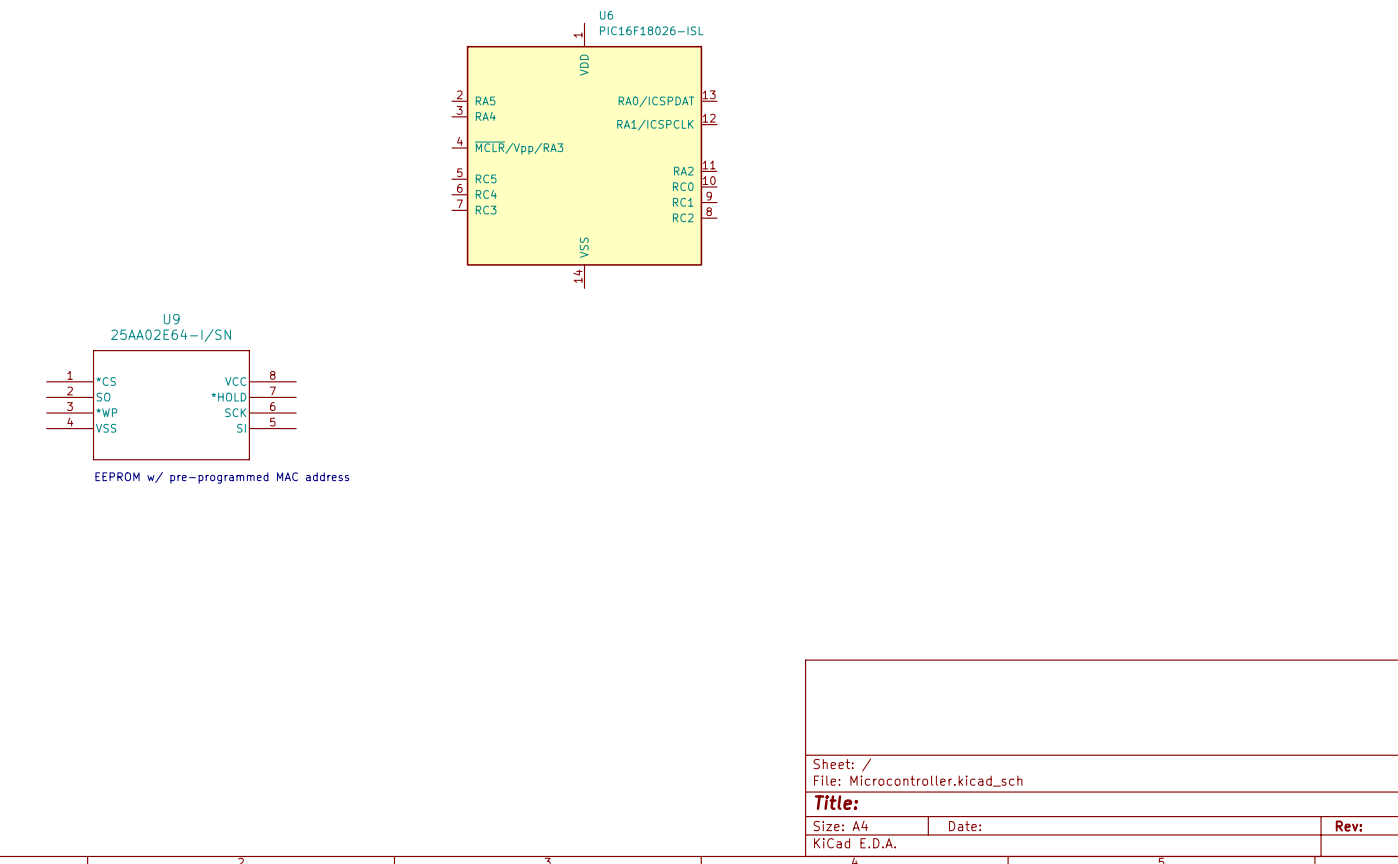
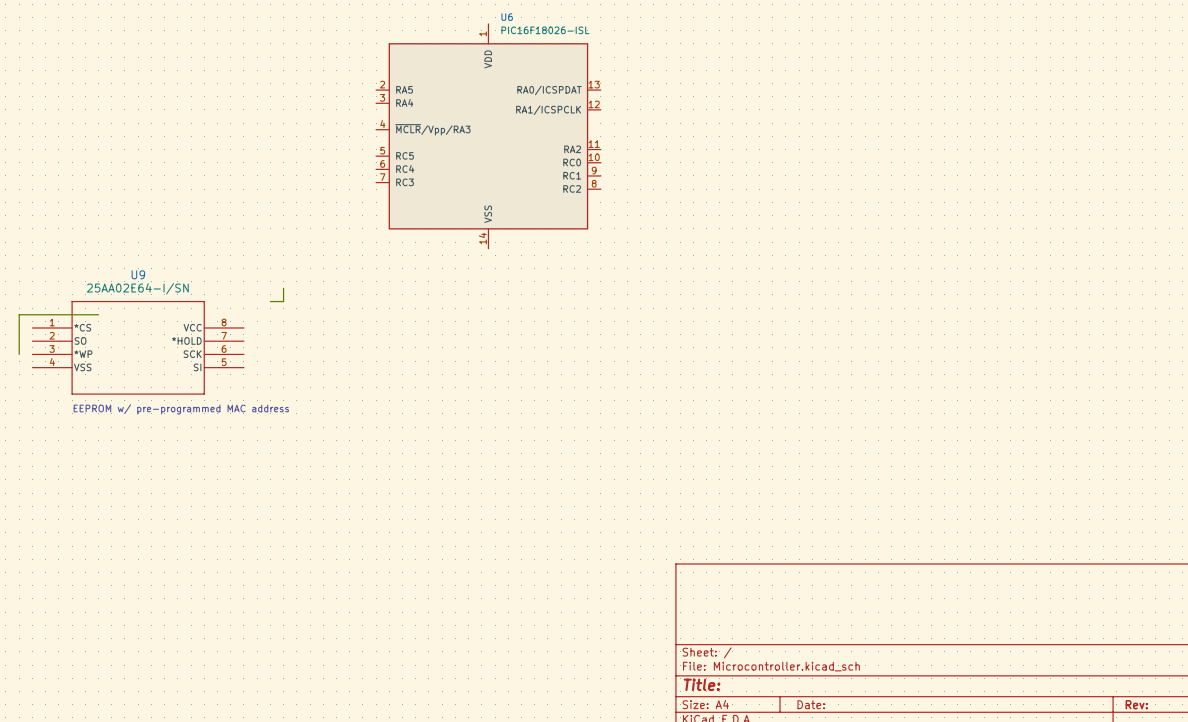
wire: none -> (283, 288) (283, 301) (270, 301)
wire: none -> (98, 314) (19, 314) (19, 354)

